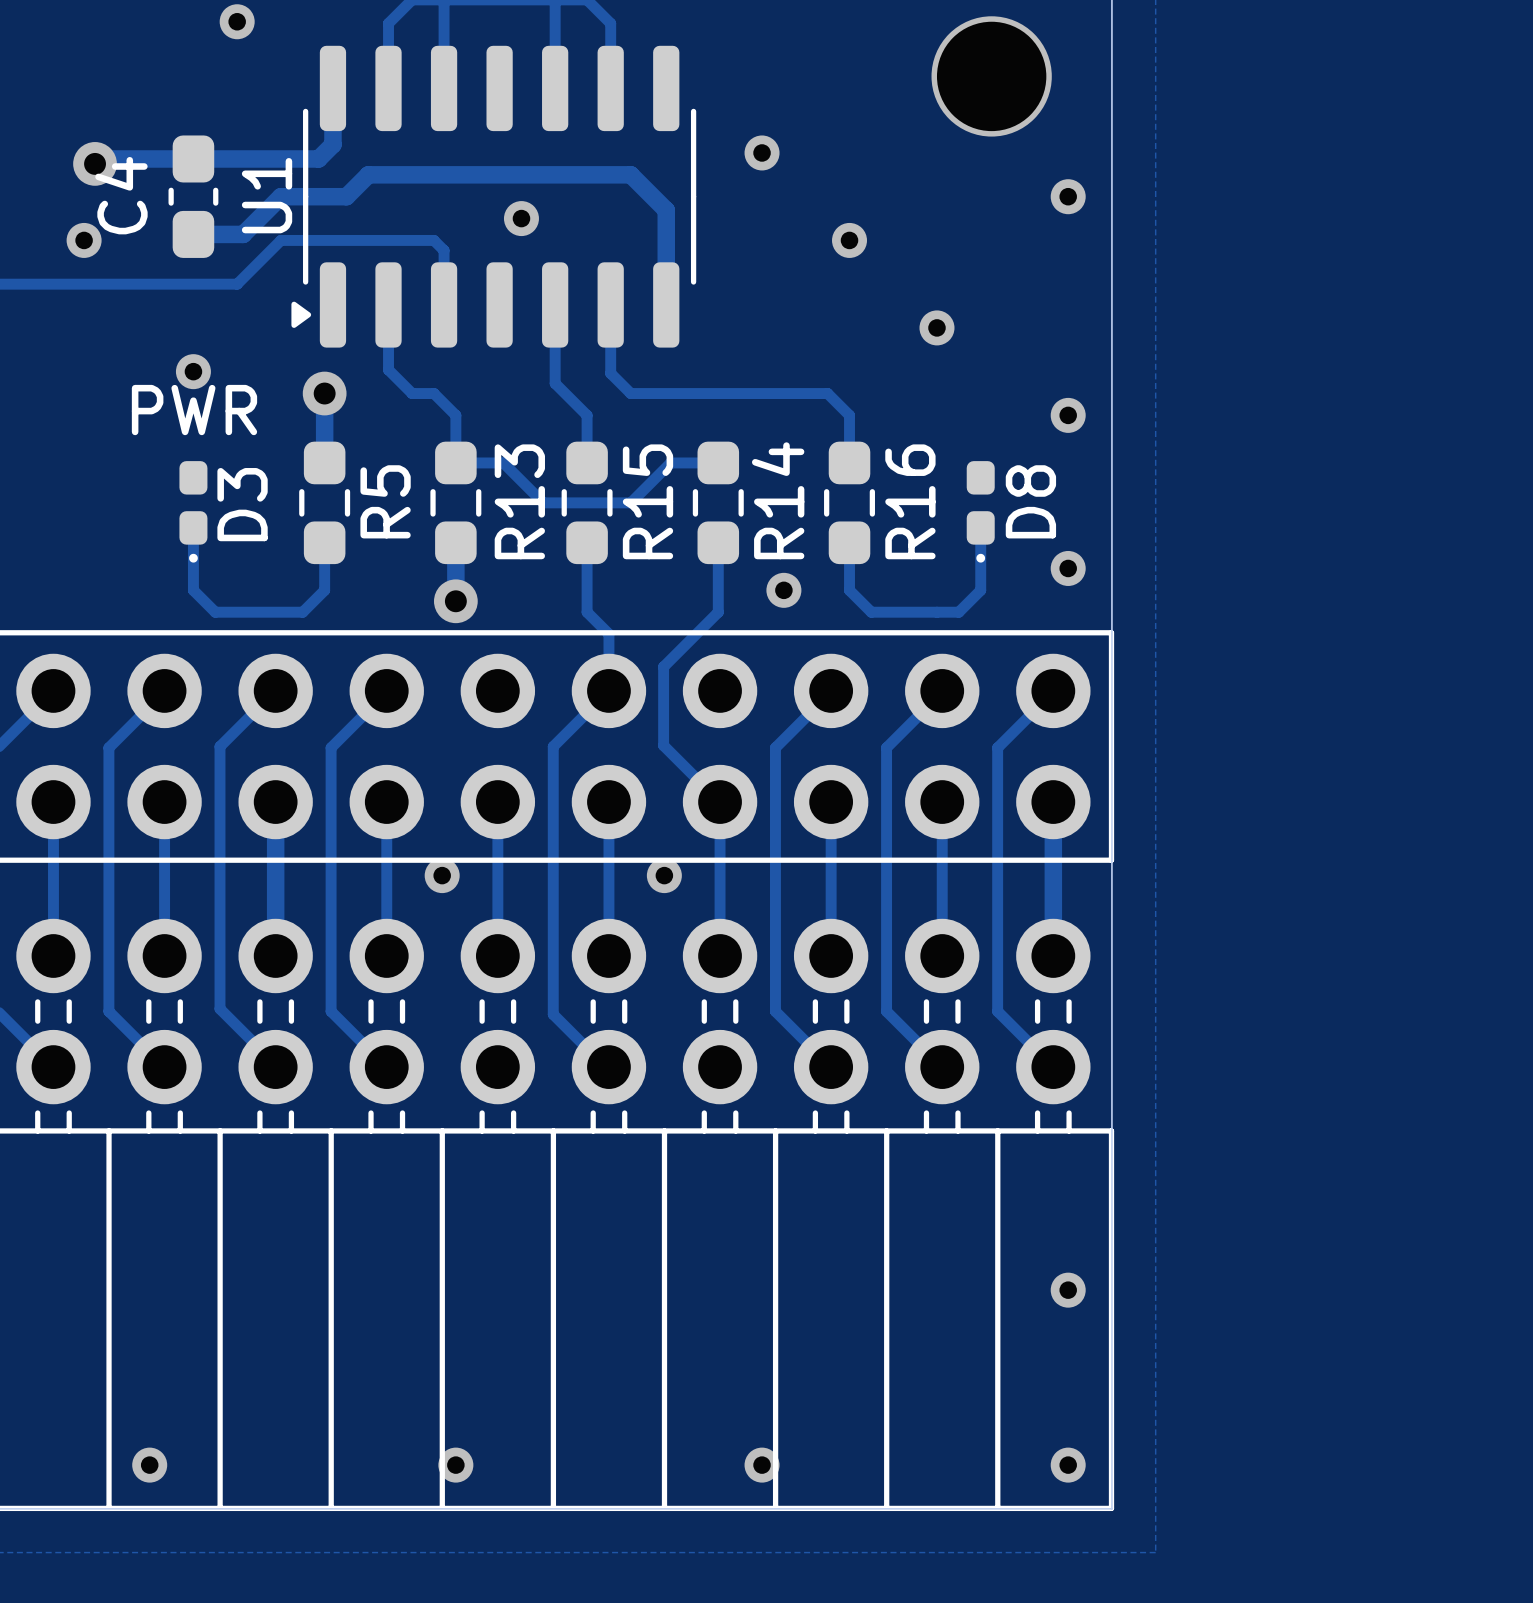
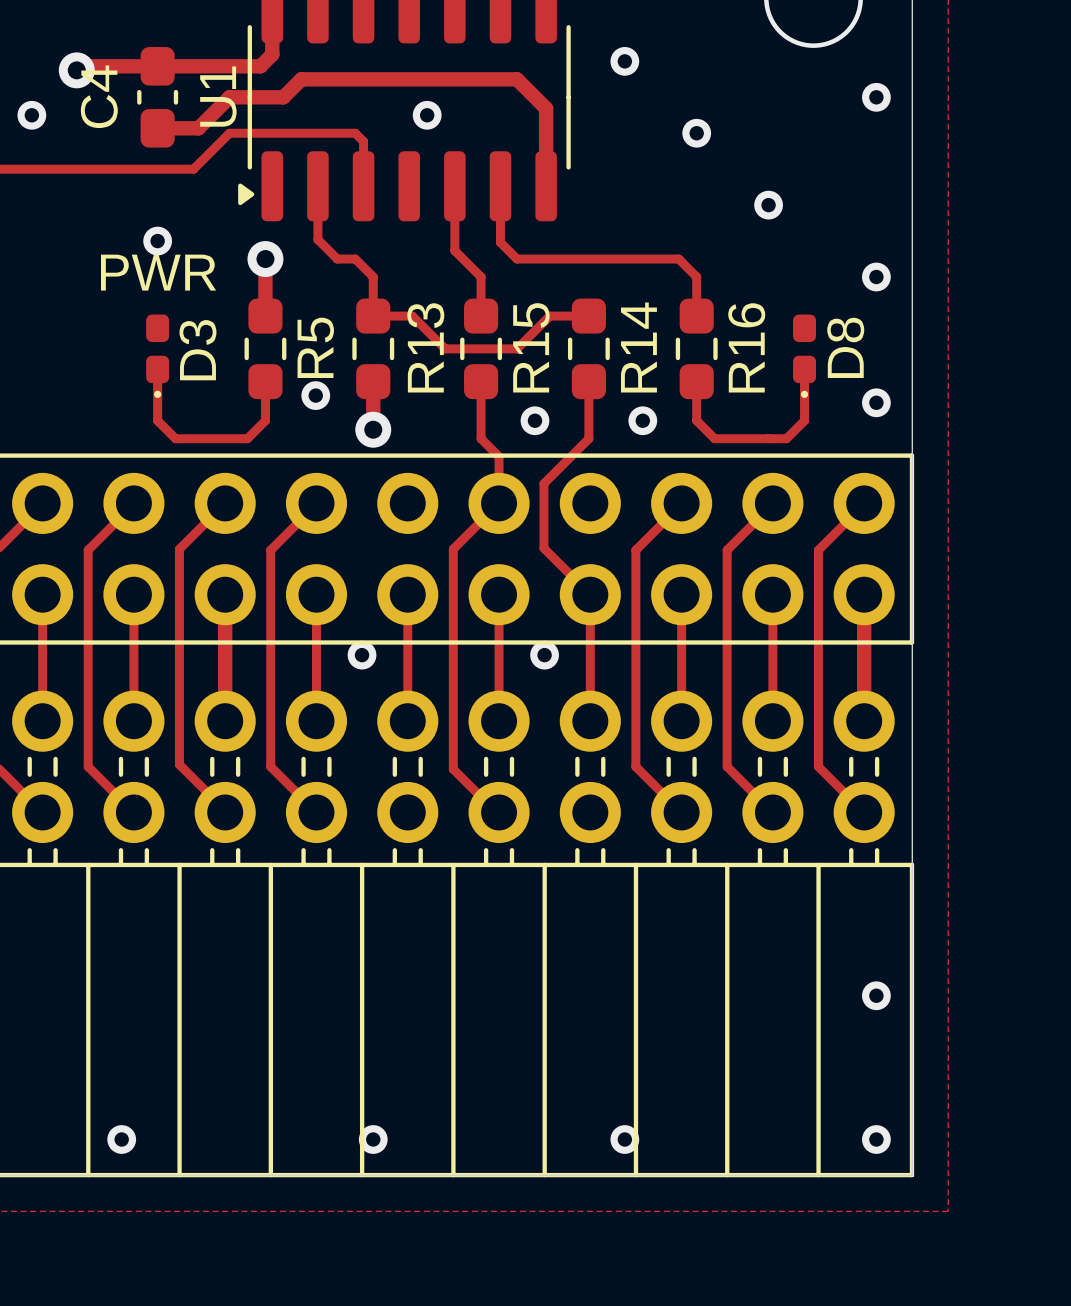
via position: (84, 240) -> (31, 115)
via: none -> (315, 395)
via: none -> (534, 420)

